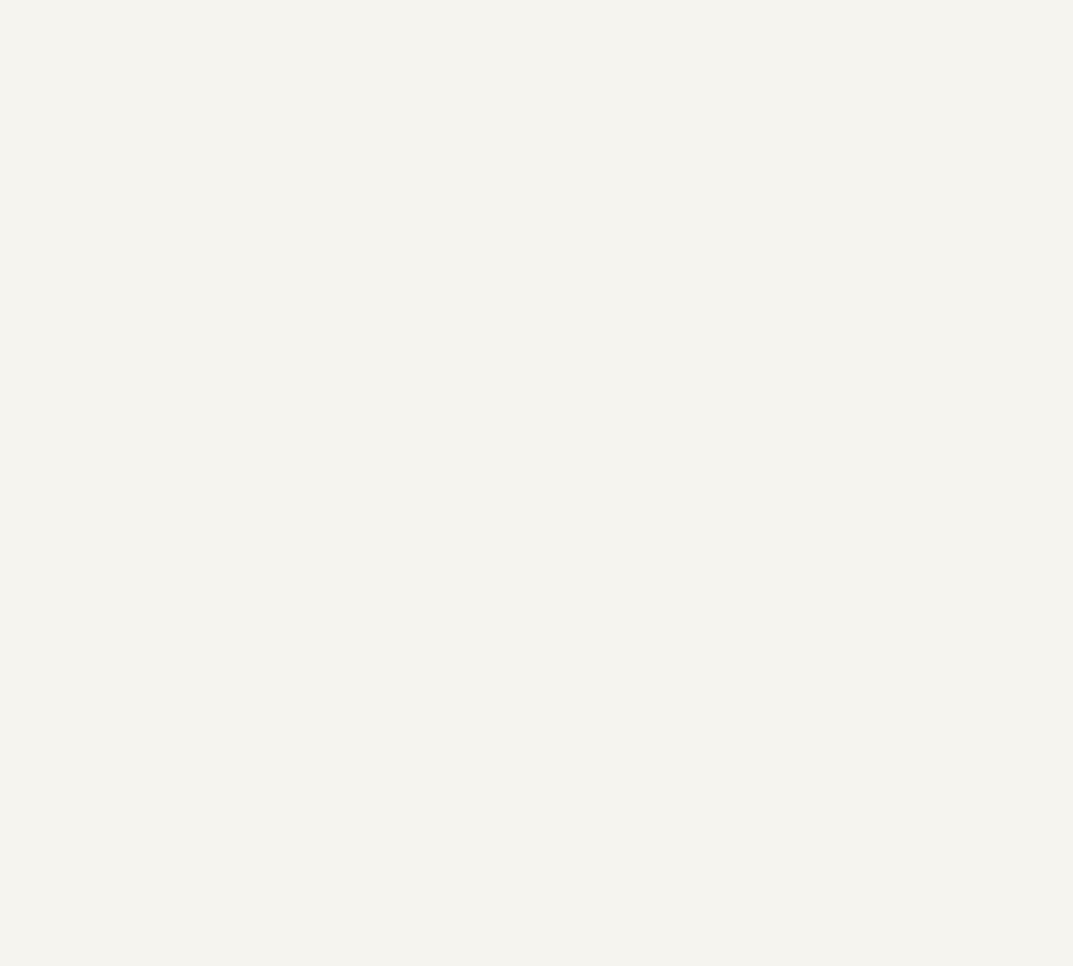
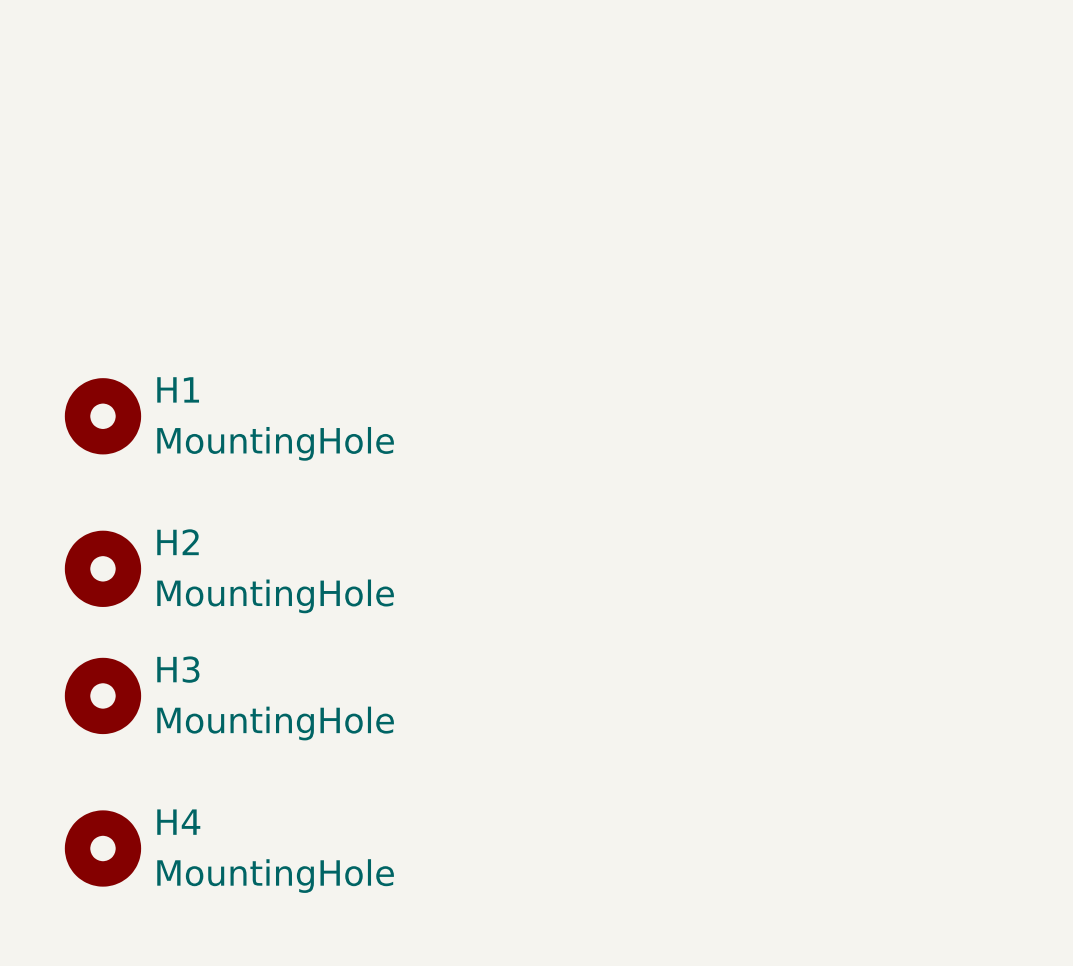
H1: none -> MountingHole (102, 416)
H2: none -> MountingHole (102, 568)
H3: none -> MountingHole (102, 695)
H4: none -> MountingHole (102, 848)

